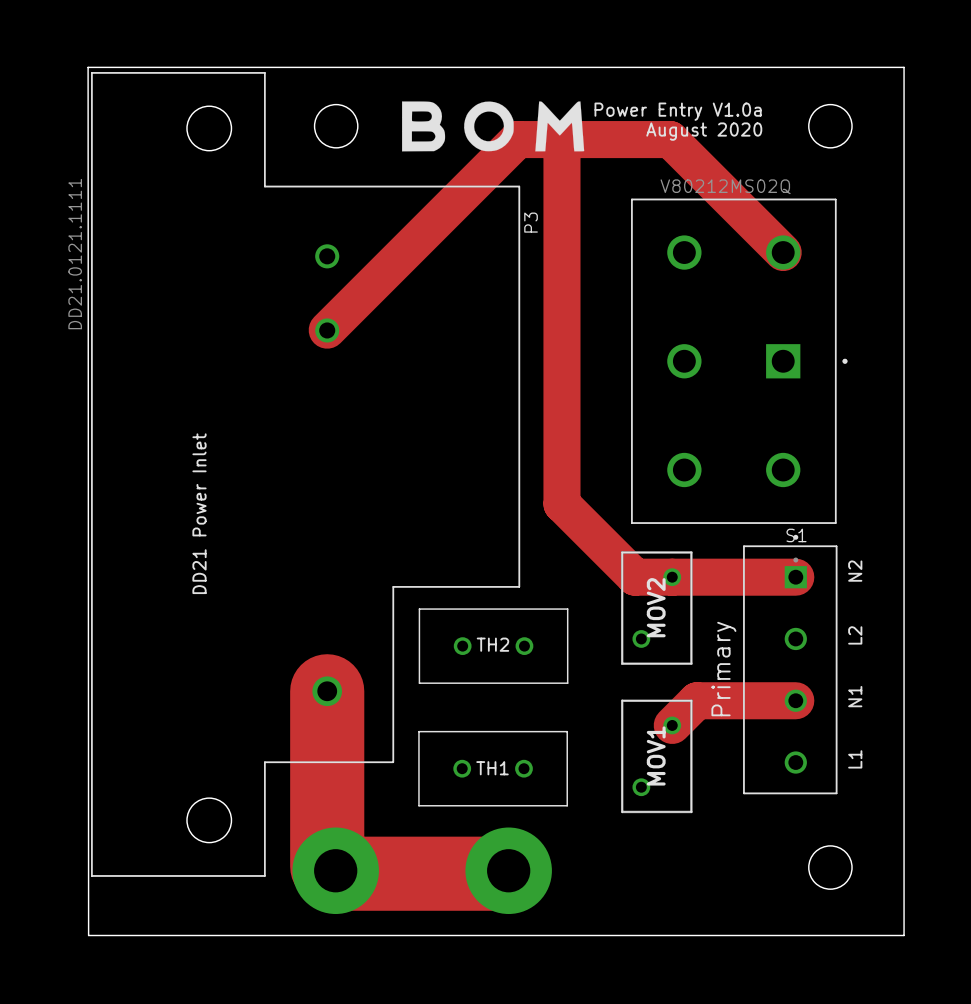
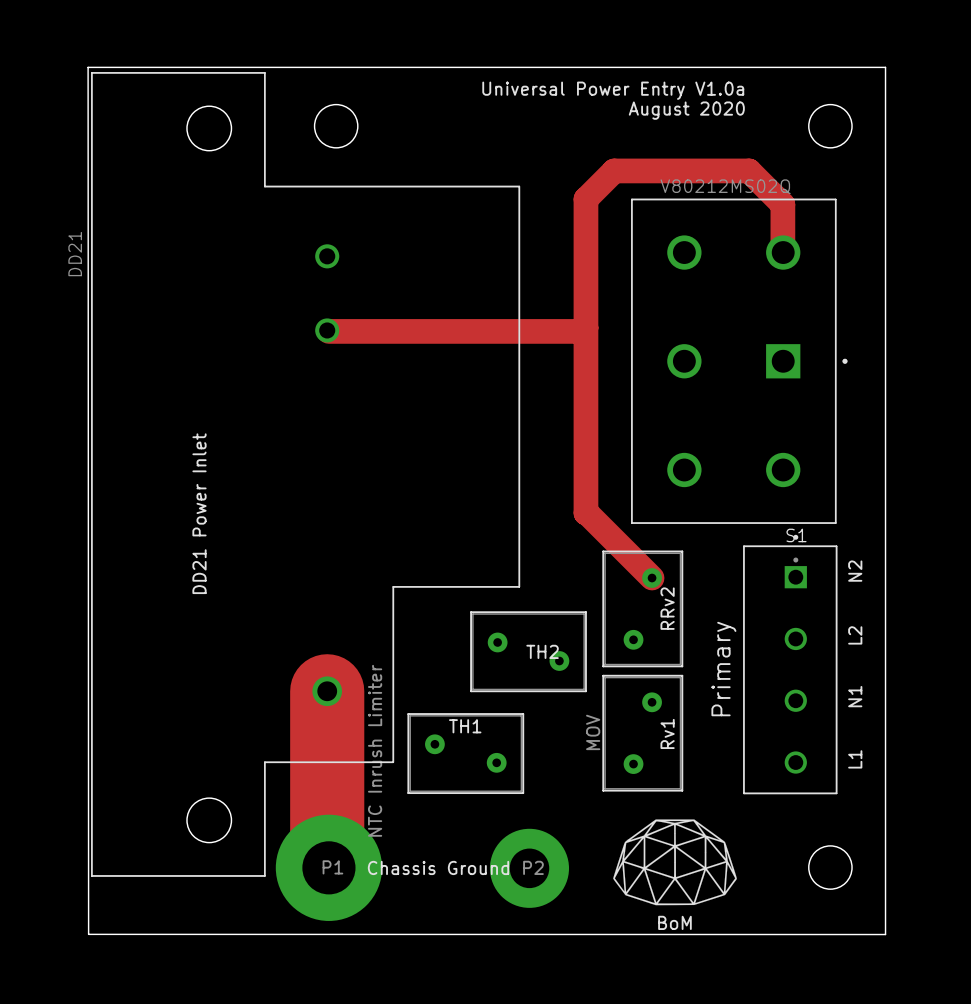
board edge: (885, 67) (904, 67) (904, 935) (88, 934) -> (885, 67) (885, 934) (88, 934)
drawing: [402, 101, 585, 152] -> none
text: Power Entry V1.0a (678, 111) -> Universal Power Entry V1.0a (613, 90)
text position: August 2020 (704, 131) -> August 2020 (686, 110)
track: (561, 139) (561, 504) (635, 577) (795, 577) -> none
P3 name: P3 (531, 222) -> none
track: (783, 252) (670, 139) (517, 139) (327, 330) -> none
P3 value: DD21.0121.1111 (75, 254) -> DD21 (75, 254)
track: none -> (782, 256) (782, 204) (749, 170) (614, 170) (585, 199) (585, 513) (652, 578)
track: none -> (585, 327) (582, 331) (328, 331)
TH2 footprint: [418, 608, 569, 684] -> [470, 611, 587, 693]
RRv2: none -> (642, 608)
MOV2: (656, 608) -> none
track: (795, 700) (696, 700) (672, 725) -> none
TH1 footprint: [418, 730, 568, 807] -> [407, 713, 525, 795]
Rv1: none -> MOV (642, 733)
TH1 value: none -> NTC Inrush Limiter (375, 750)
MOV1: (656, 756) -> none
TH1 name position: TH1 (492, 768) -> TH1 (465, 726)
drawing: none -> [613, 819, 737, 906]
P1: none -> (328, 867)
P2: none -> Chassis Ground (529, 868)
part: (335, 870) -> none
track: (508, 870) (505, 873) (332, 873) -> none
part: (508, 870) -> none
text: none -> BoM (674, 922)

